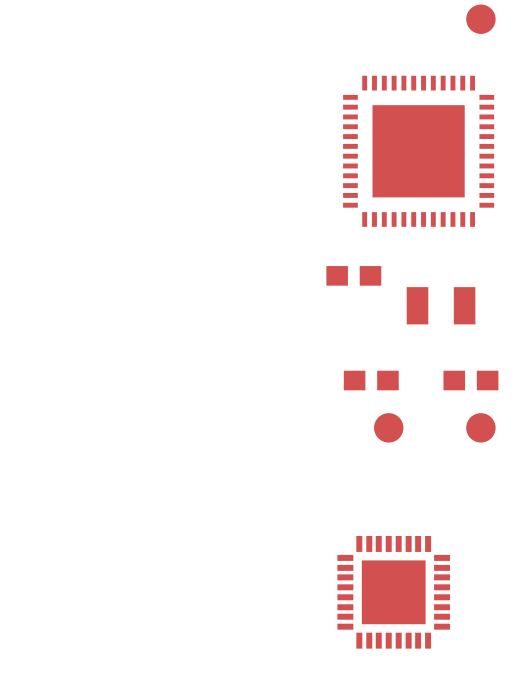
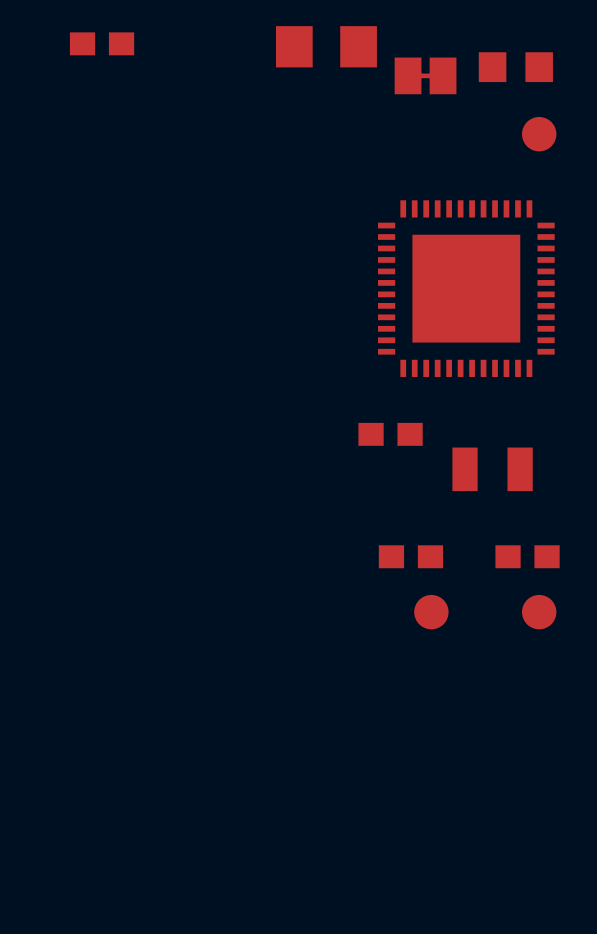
part: (393, 592) -> none

